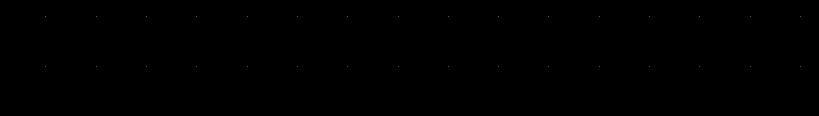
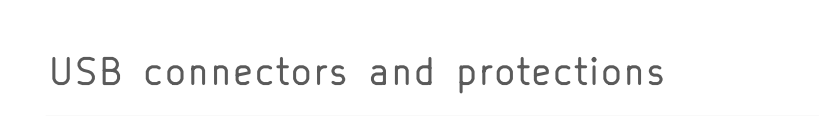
text: none -> USB connectors and protections (357, 75)

